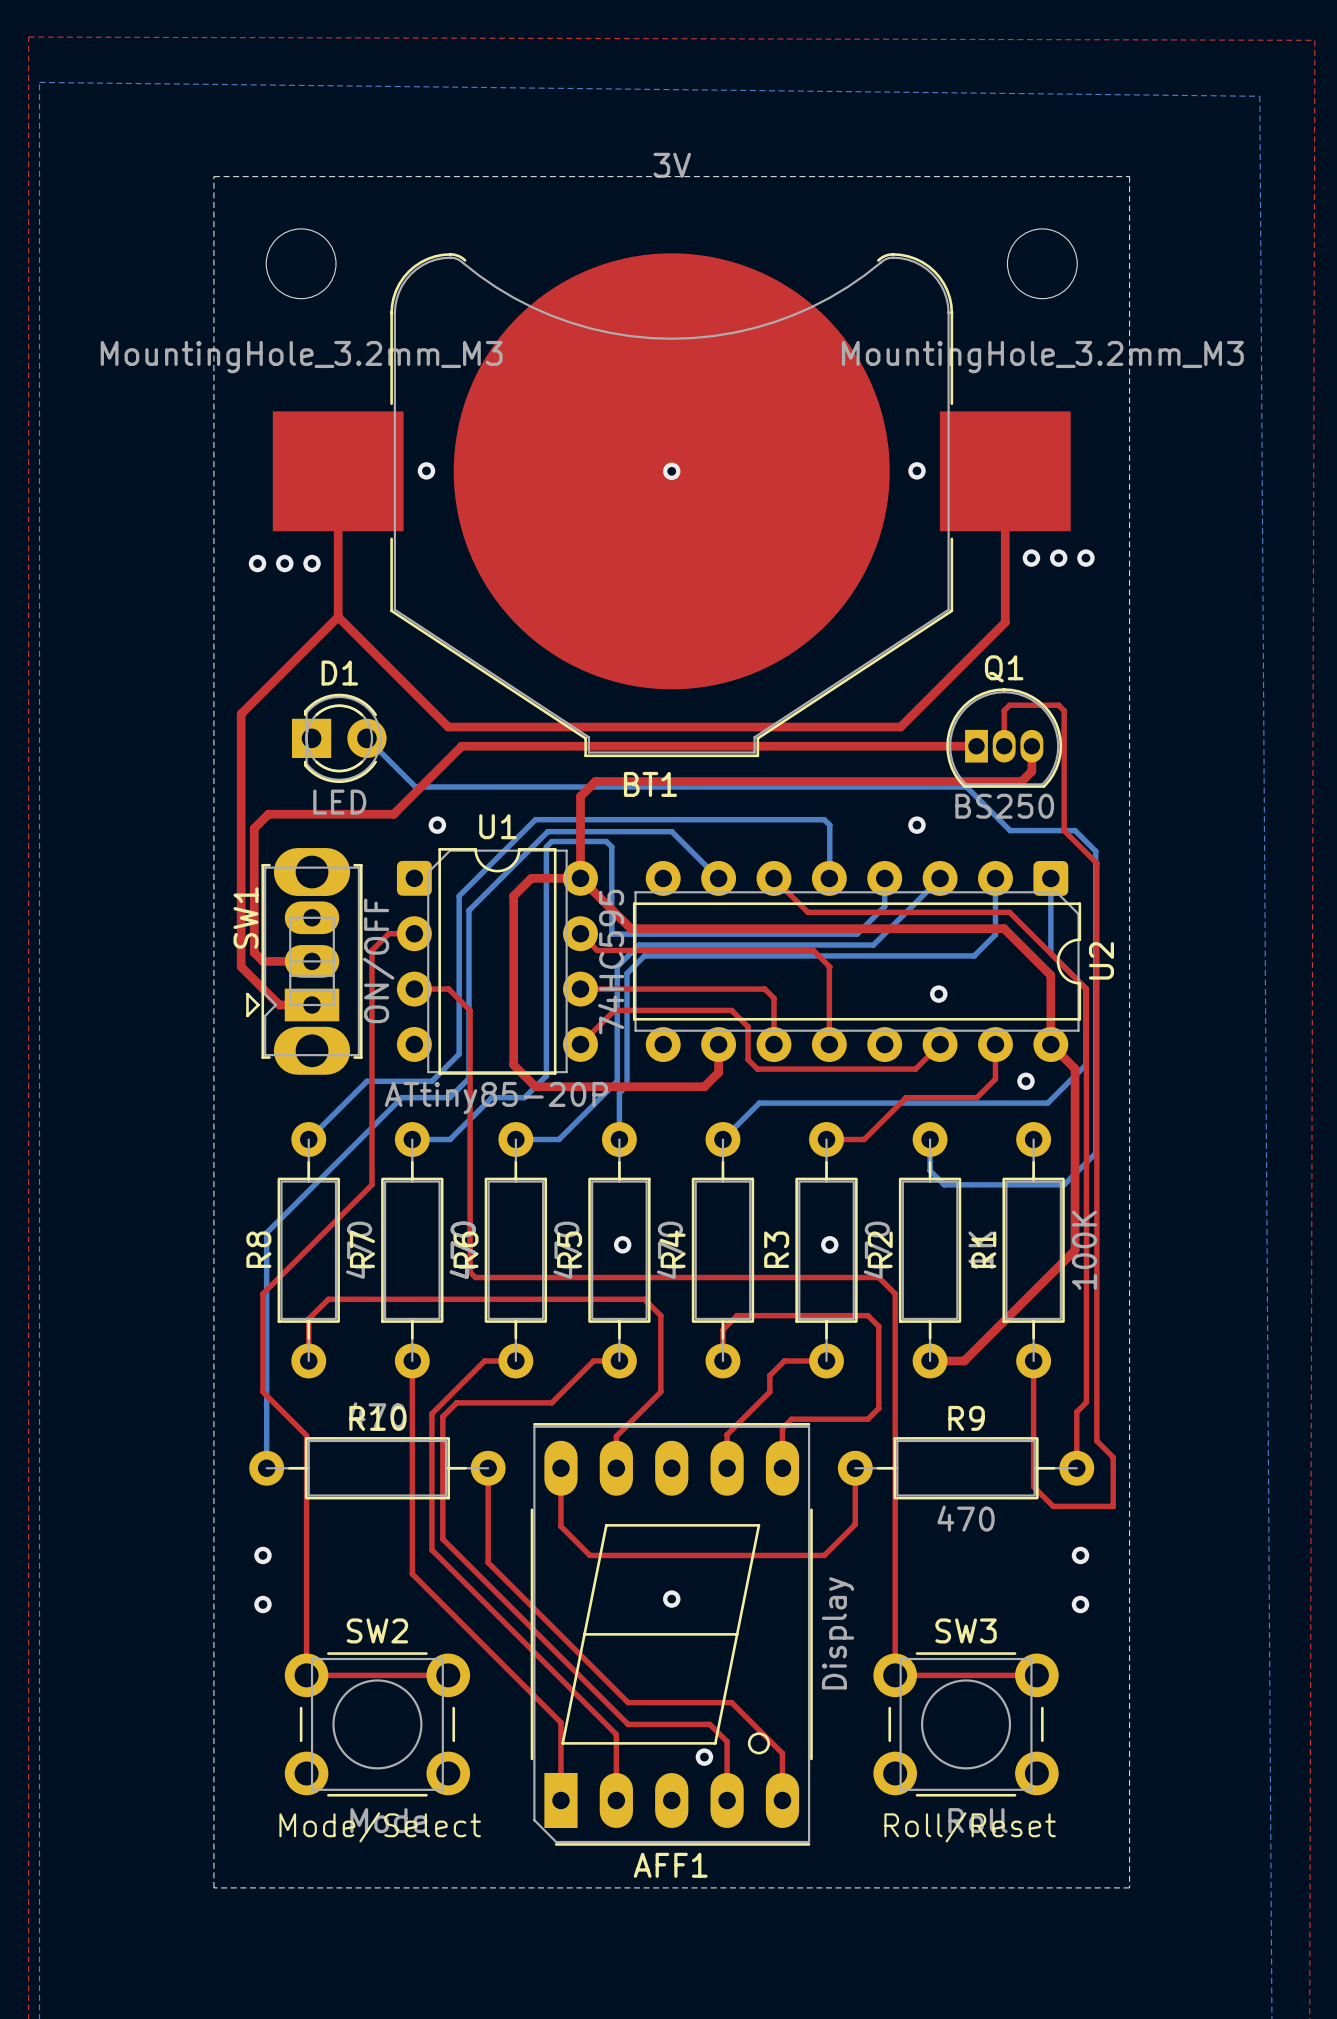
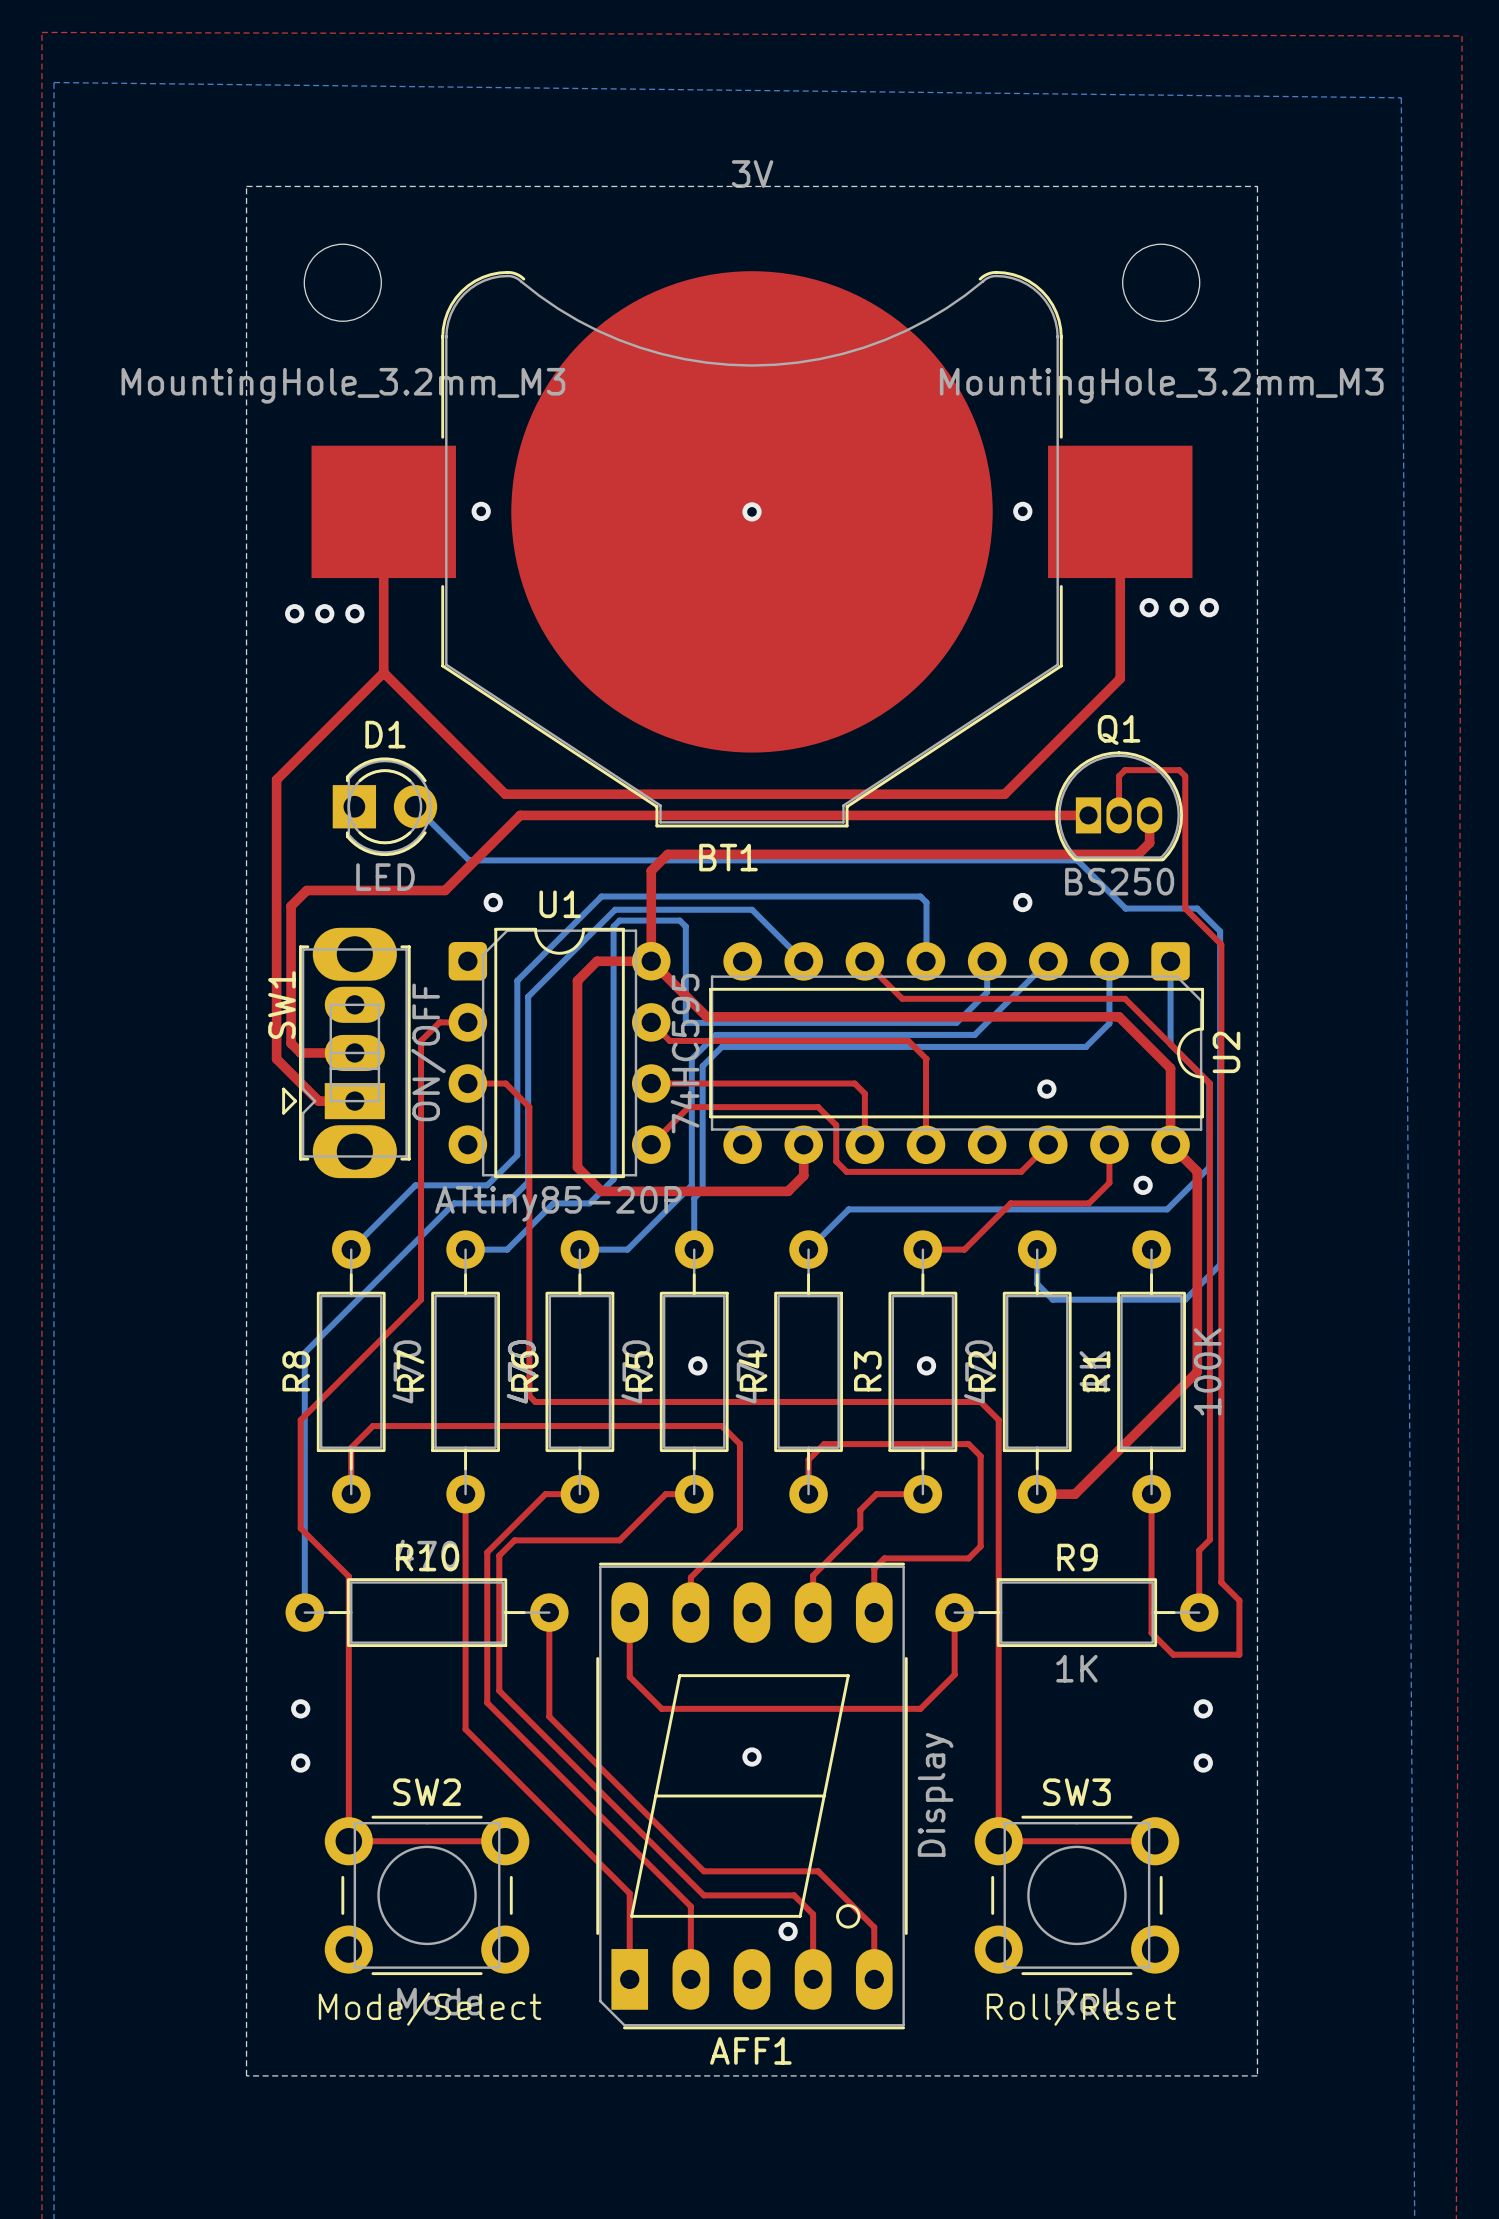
R9 value: 470 (966, 1518) -> 1K (1076, 1668)

